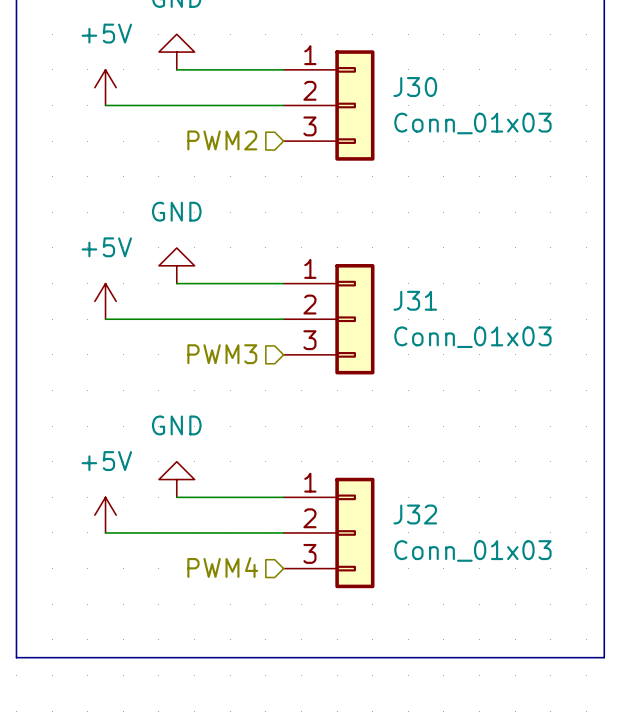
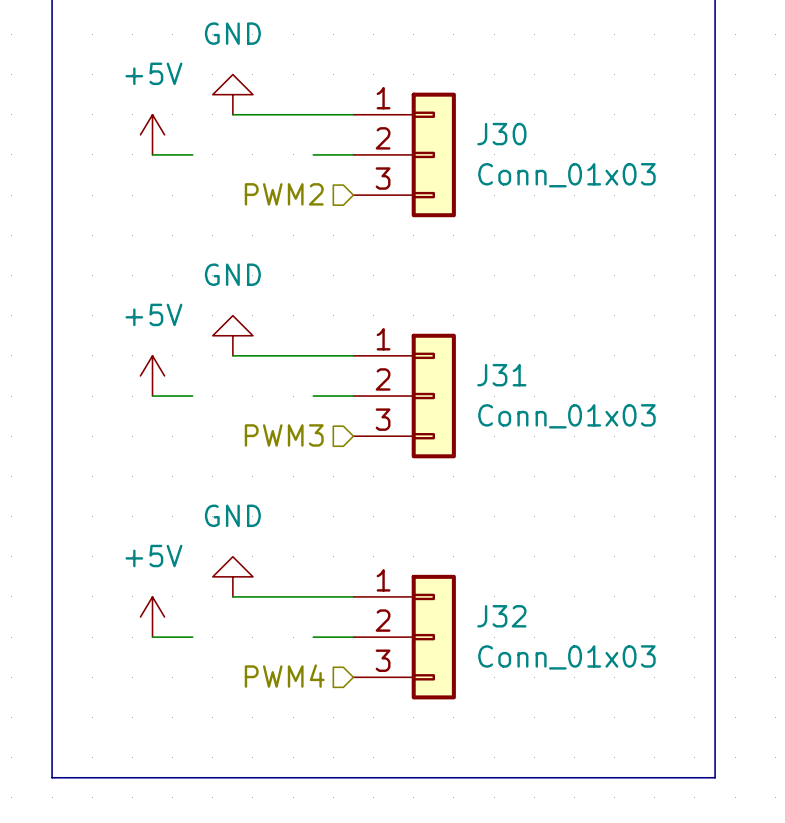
wire: (141, 105) (248, 105) -> none
wire: (141, 319) (248, 319) -> none
wire: (141, 532) (248, 532) -> none

